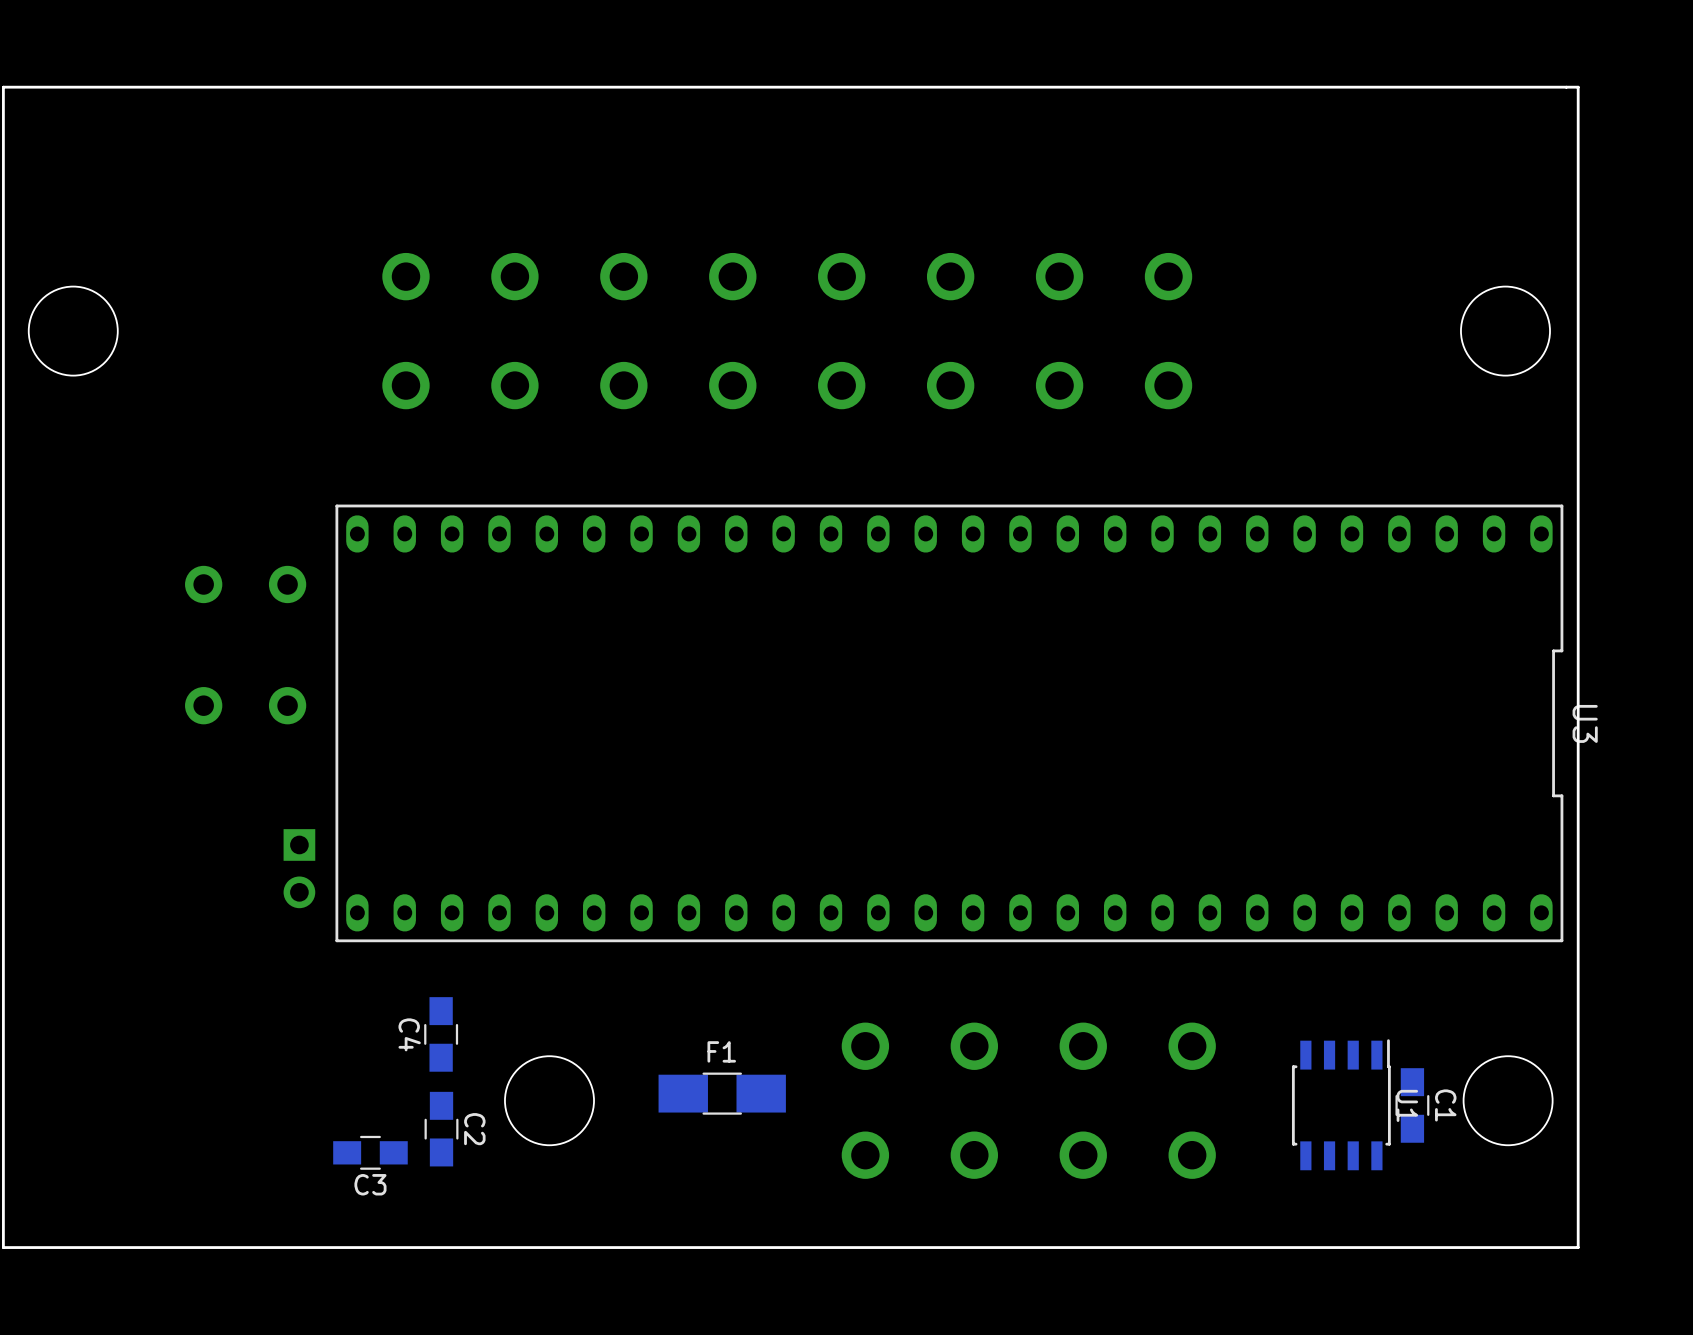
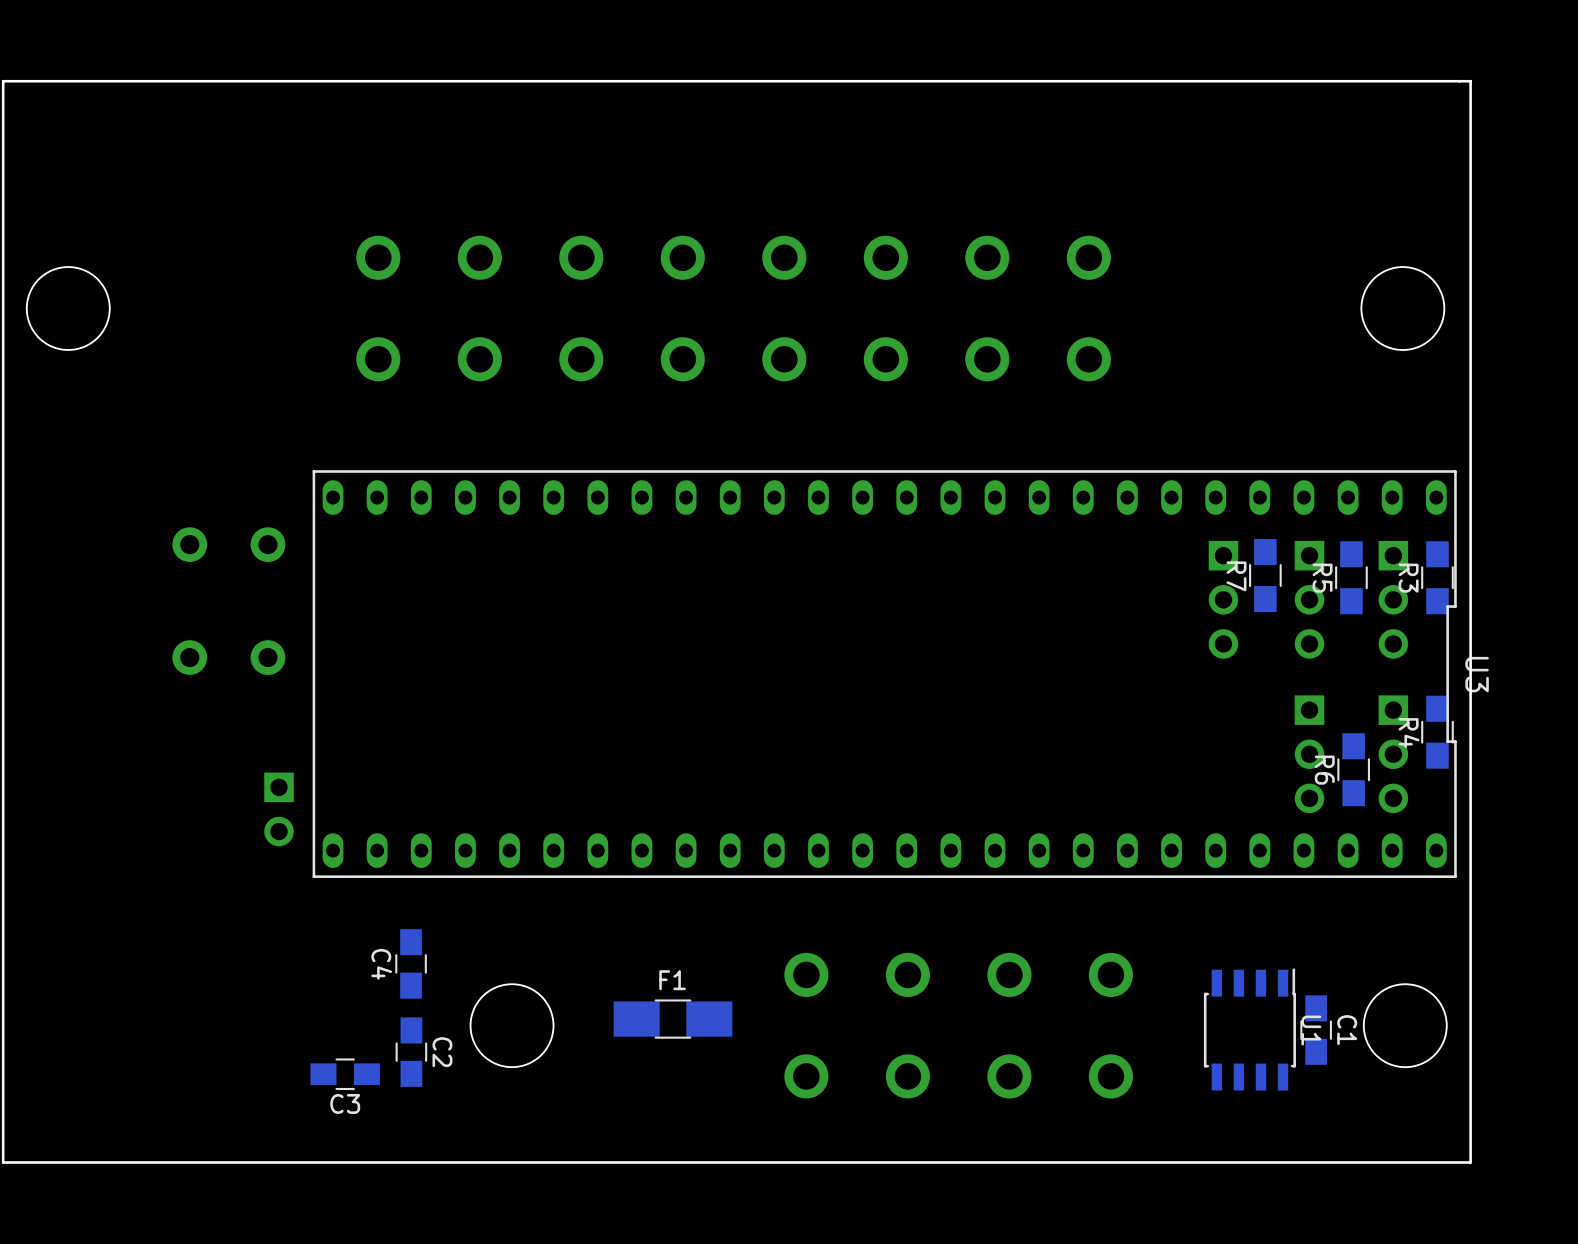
R7: none -> (1265, 575)
R5: none -> (1351, 577)
R3: none -> (1437, 577)
part: none -> (1223, 599)
part: none -> (1309, 599)
part: none -> (1393, 599)
R4: none -> (1437, 732)
part: none -> (1309, 754)
part: none -> (1393, 754)
R6: none -> (1353, 769)

